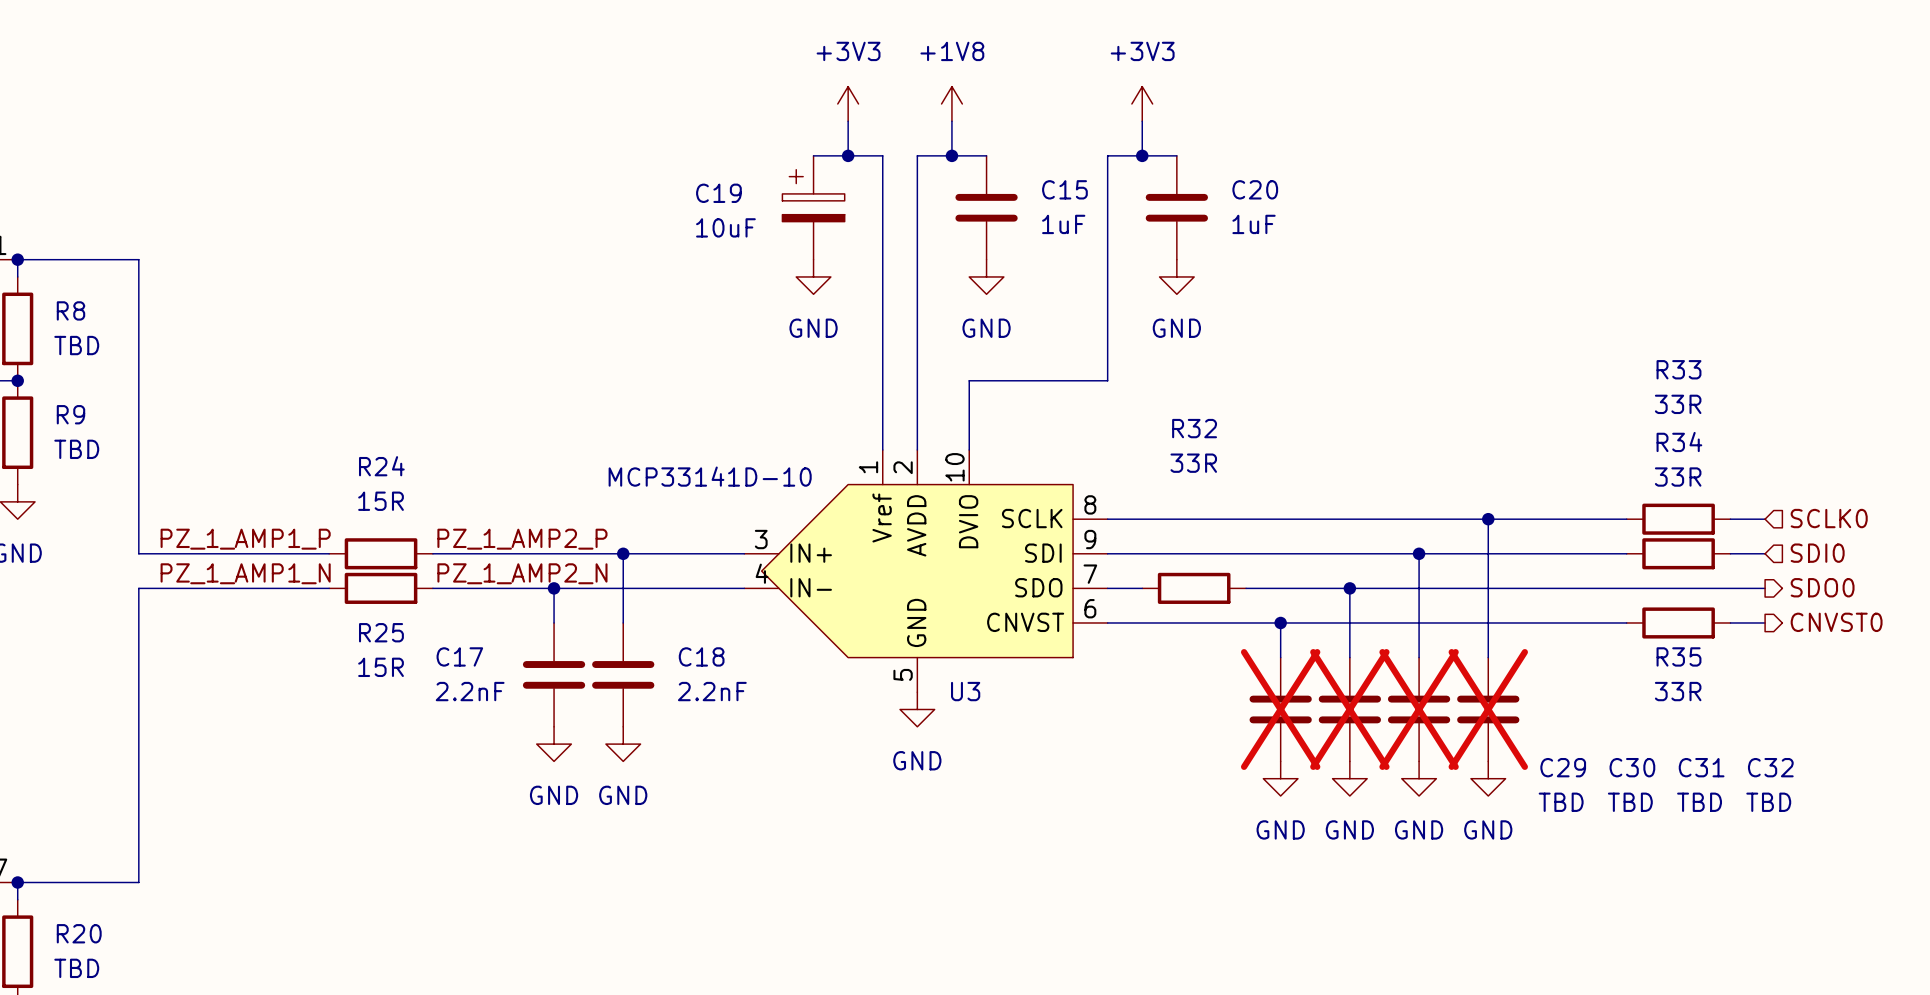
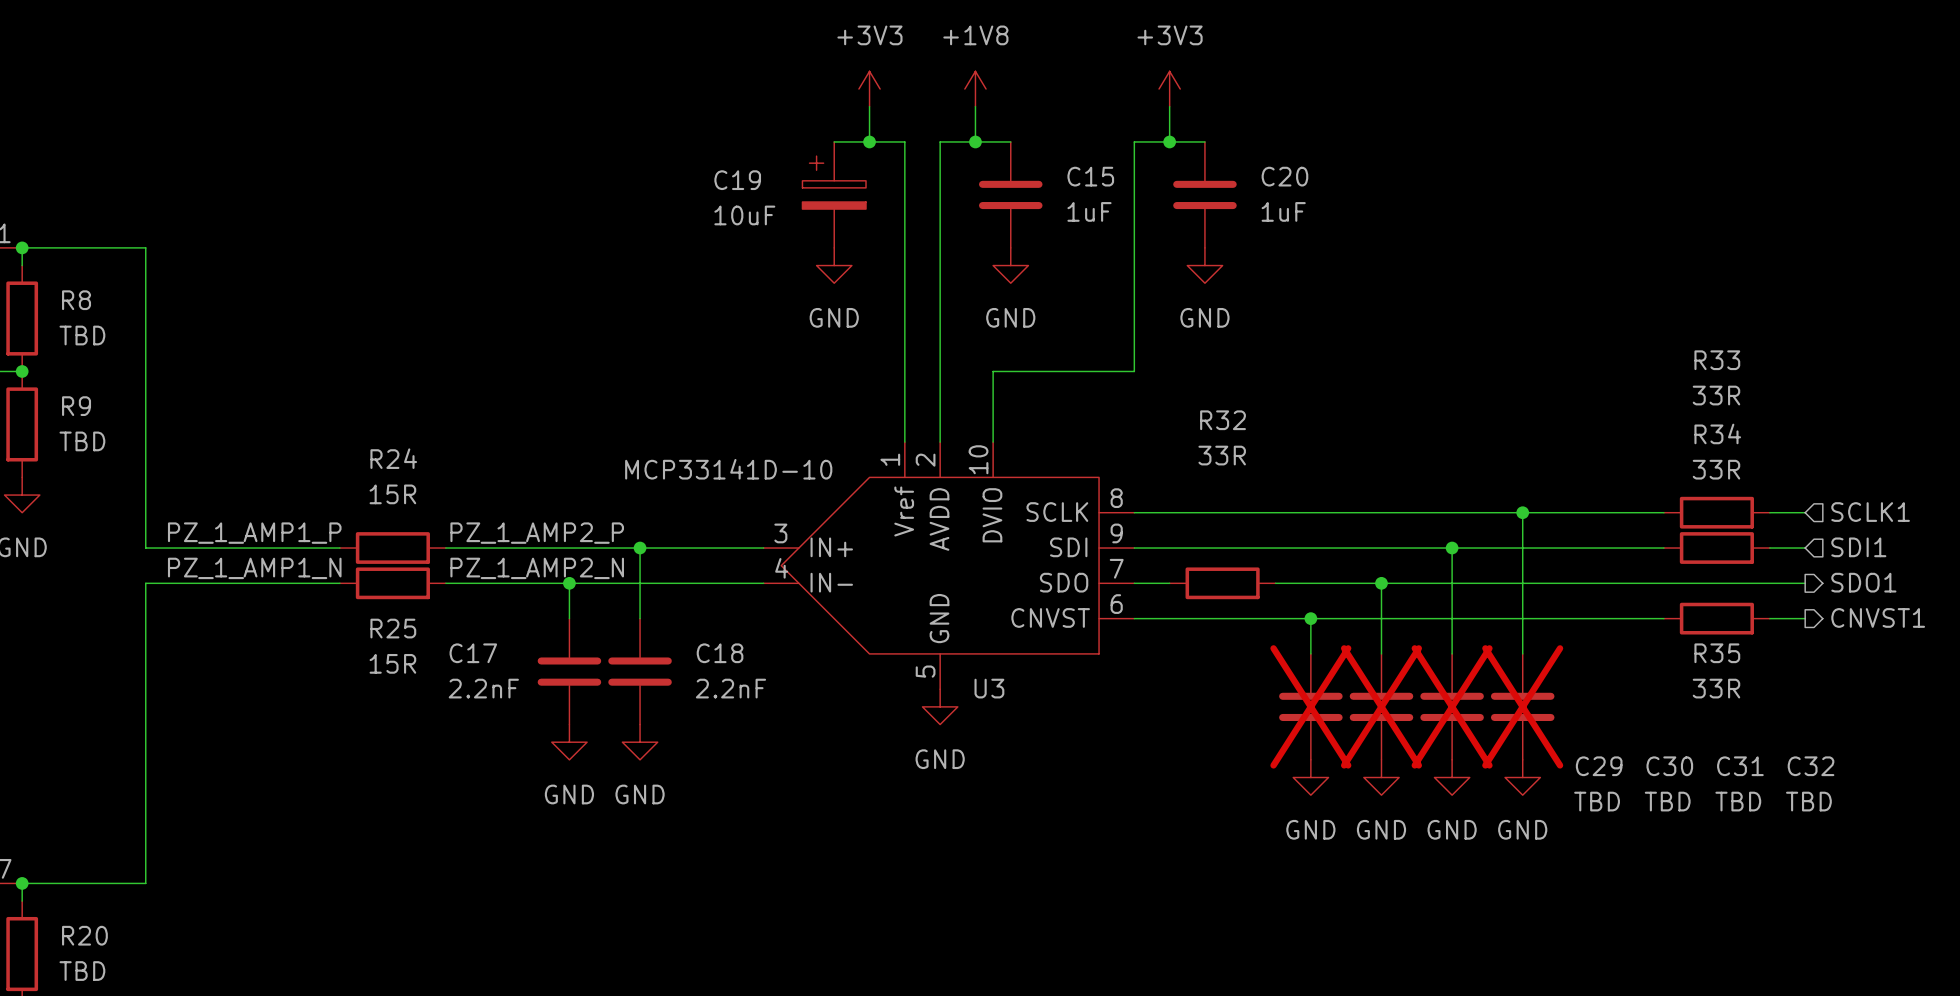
hierarchical label: SCLK0 (1829, 518) -> SCLK1 (1870, 512)
hierarchical label: SDI0 (1817, 553) -> SDI1 (1858, 547)
hierarchical label: SDO0 (1822, 587) -> SDO1 (1863, 582)
hierarchical label: CNVST0 (1836, 622) -> CNVST1 (1878, 617)

